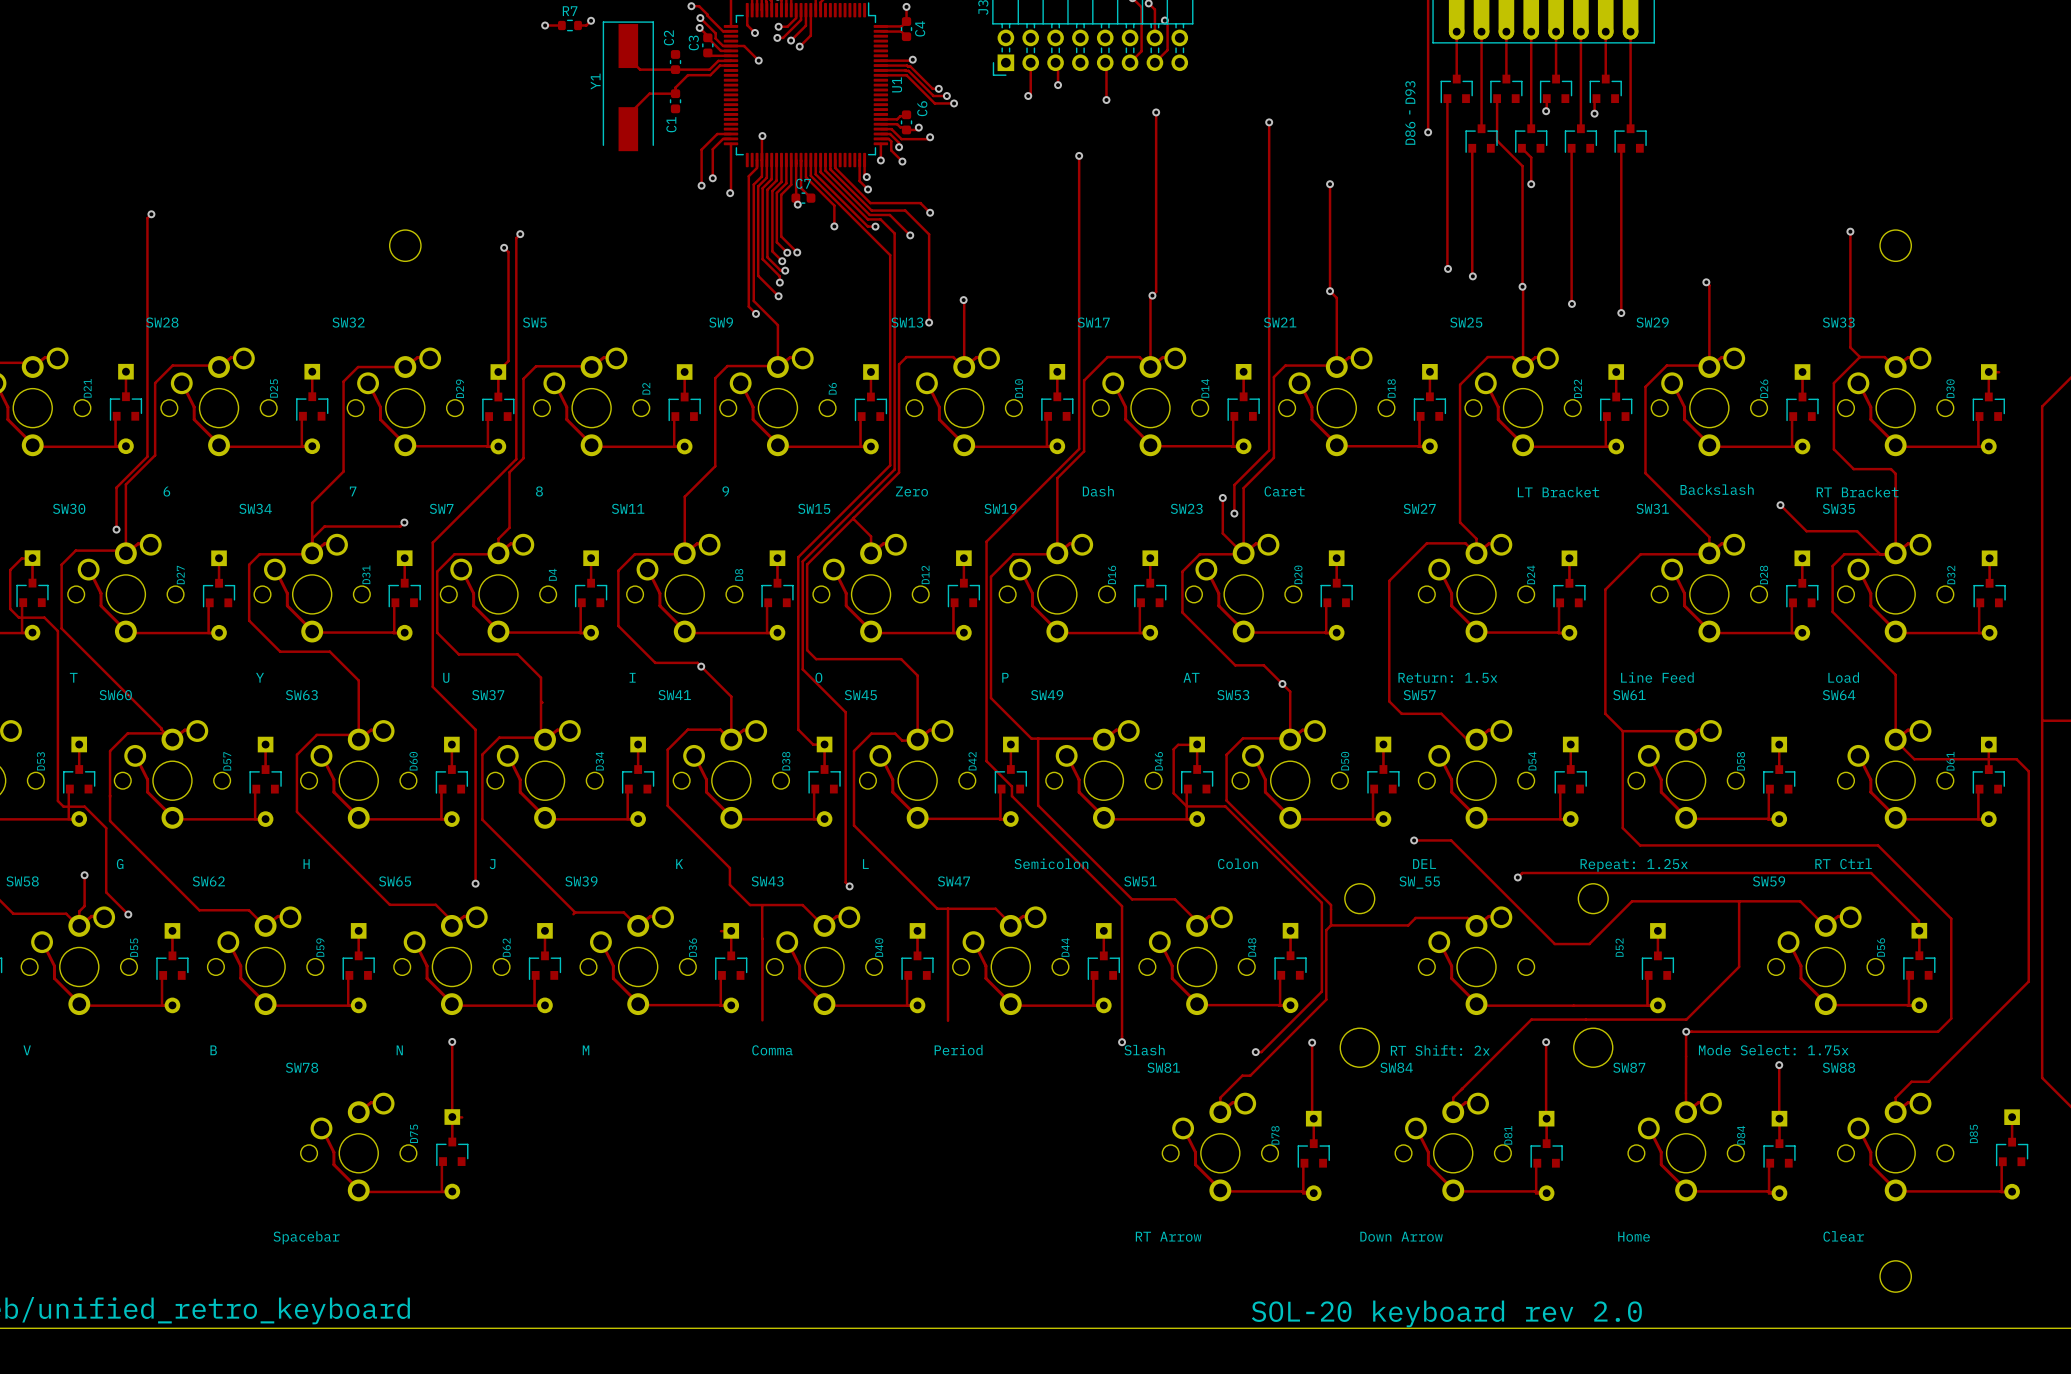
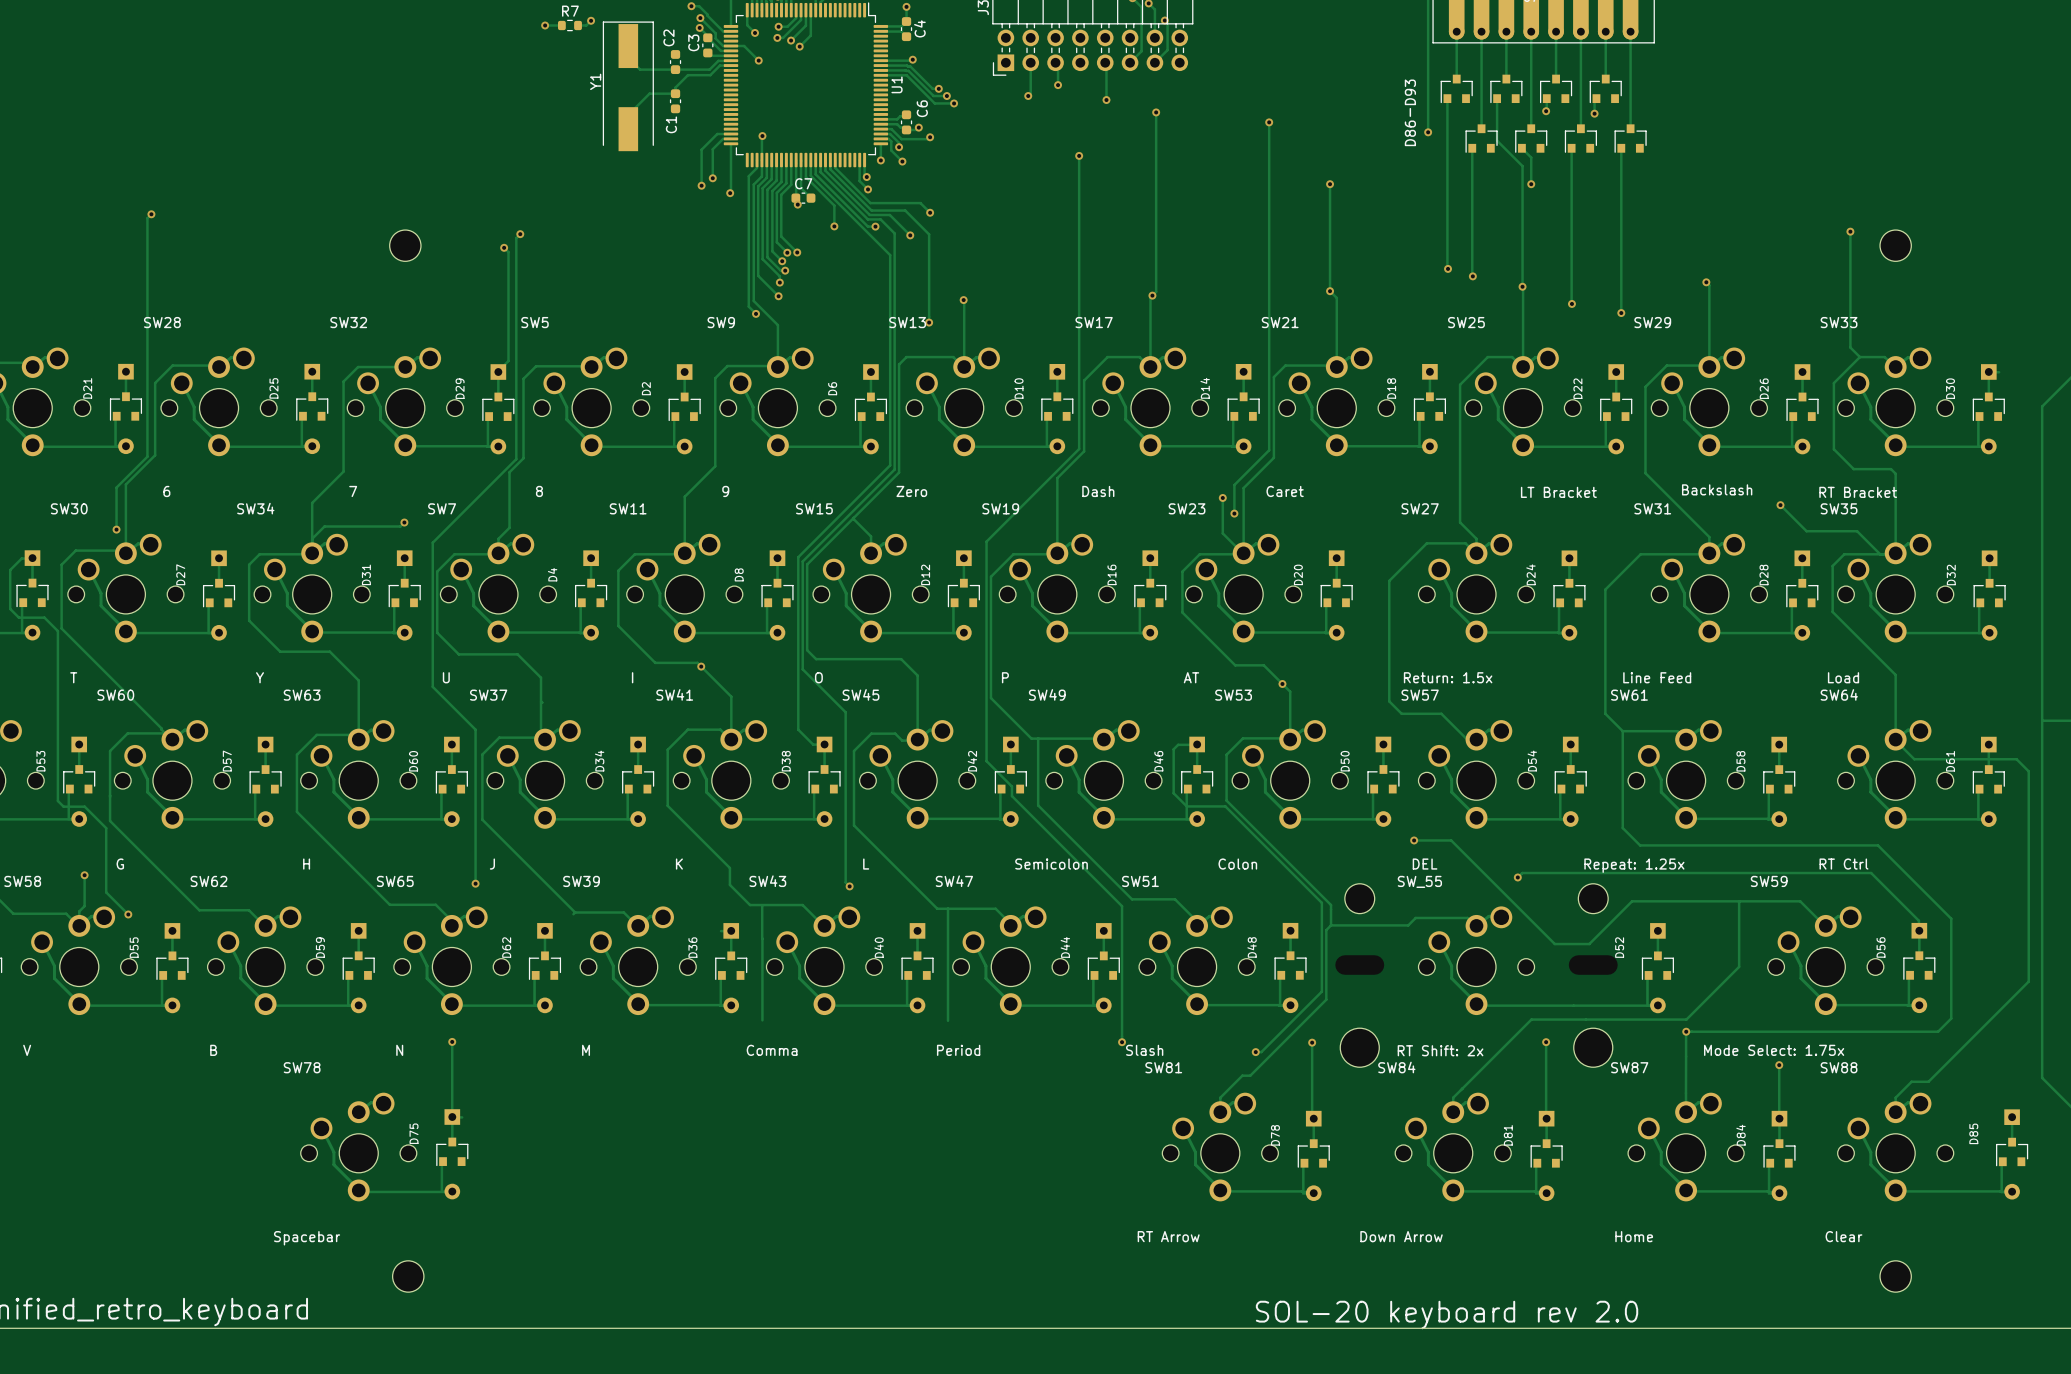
part: none -> (408, 1276)

